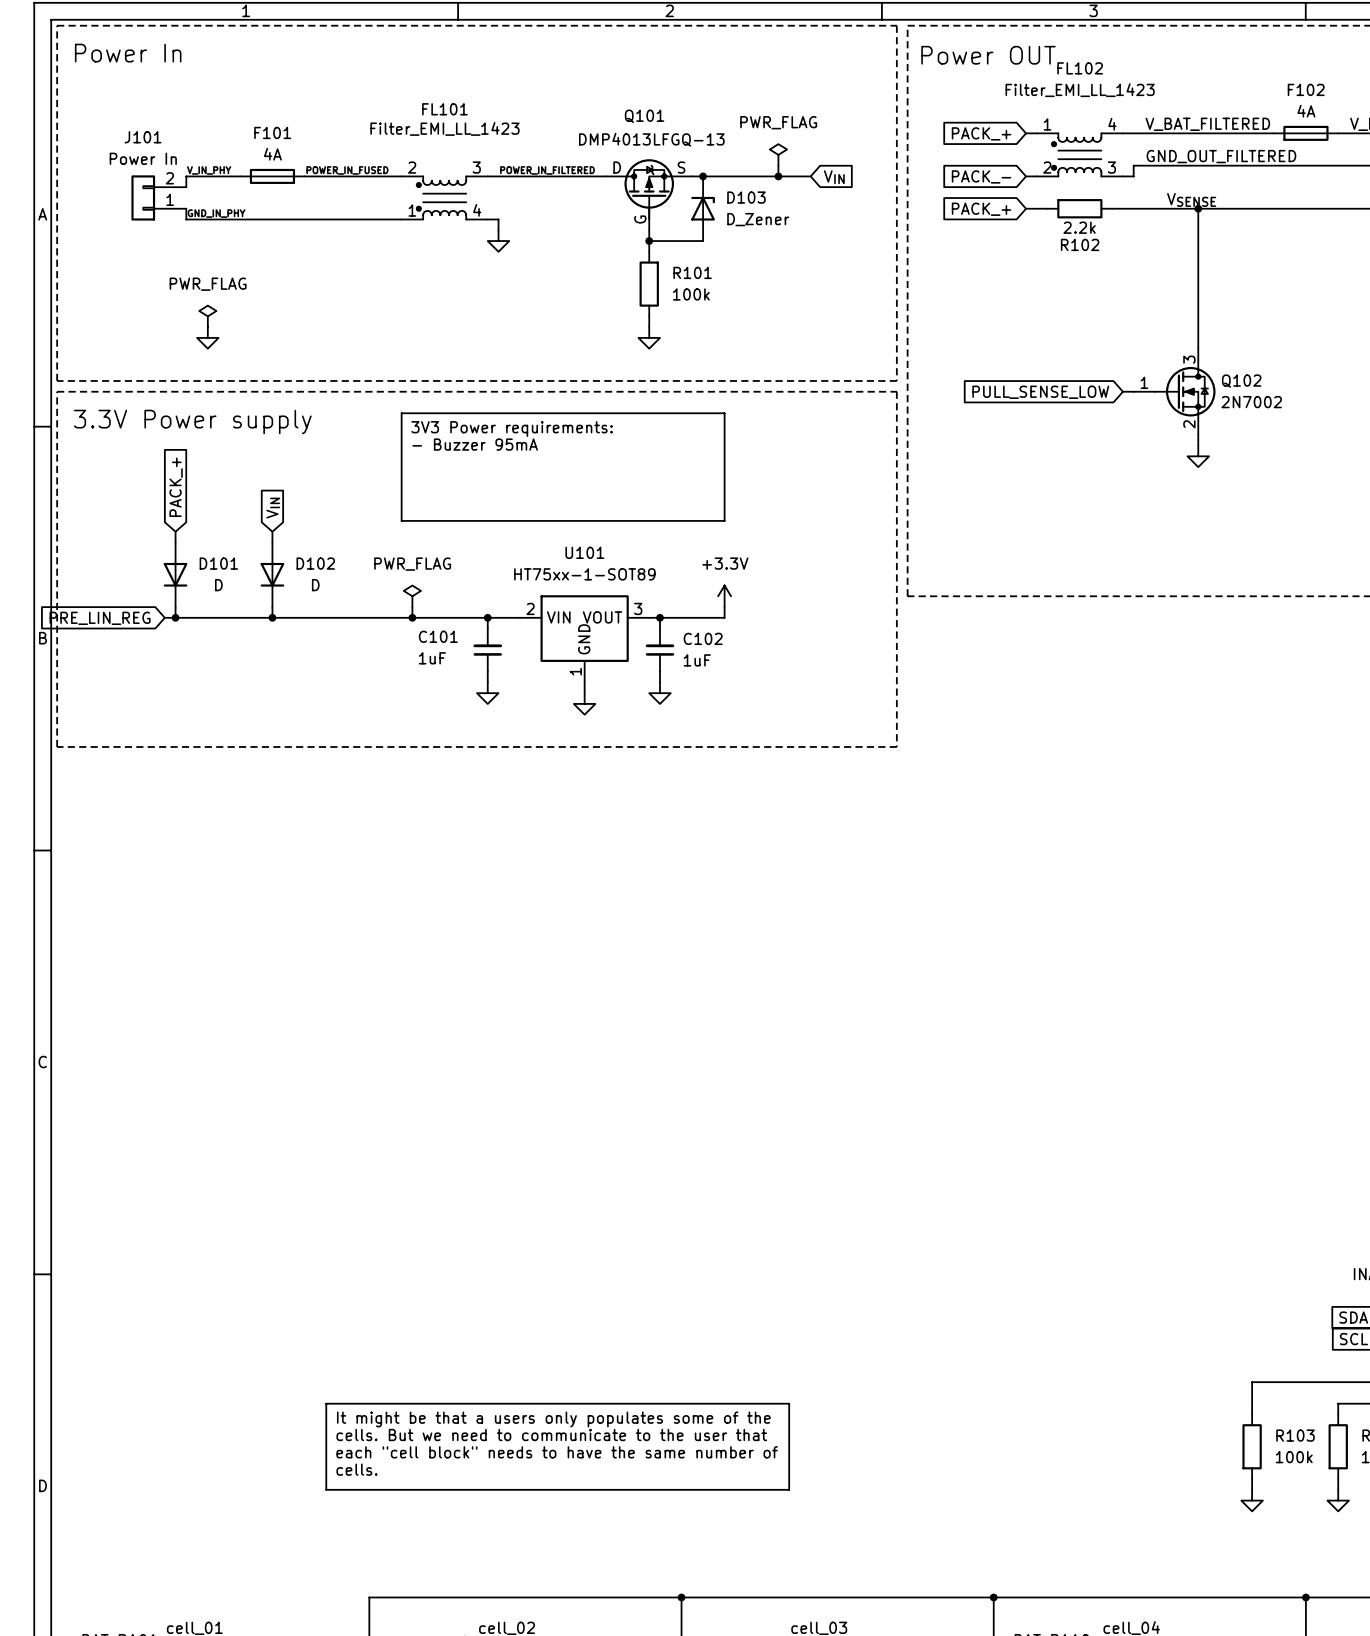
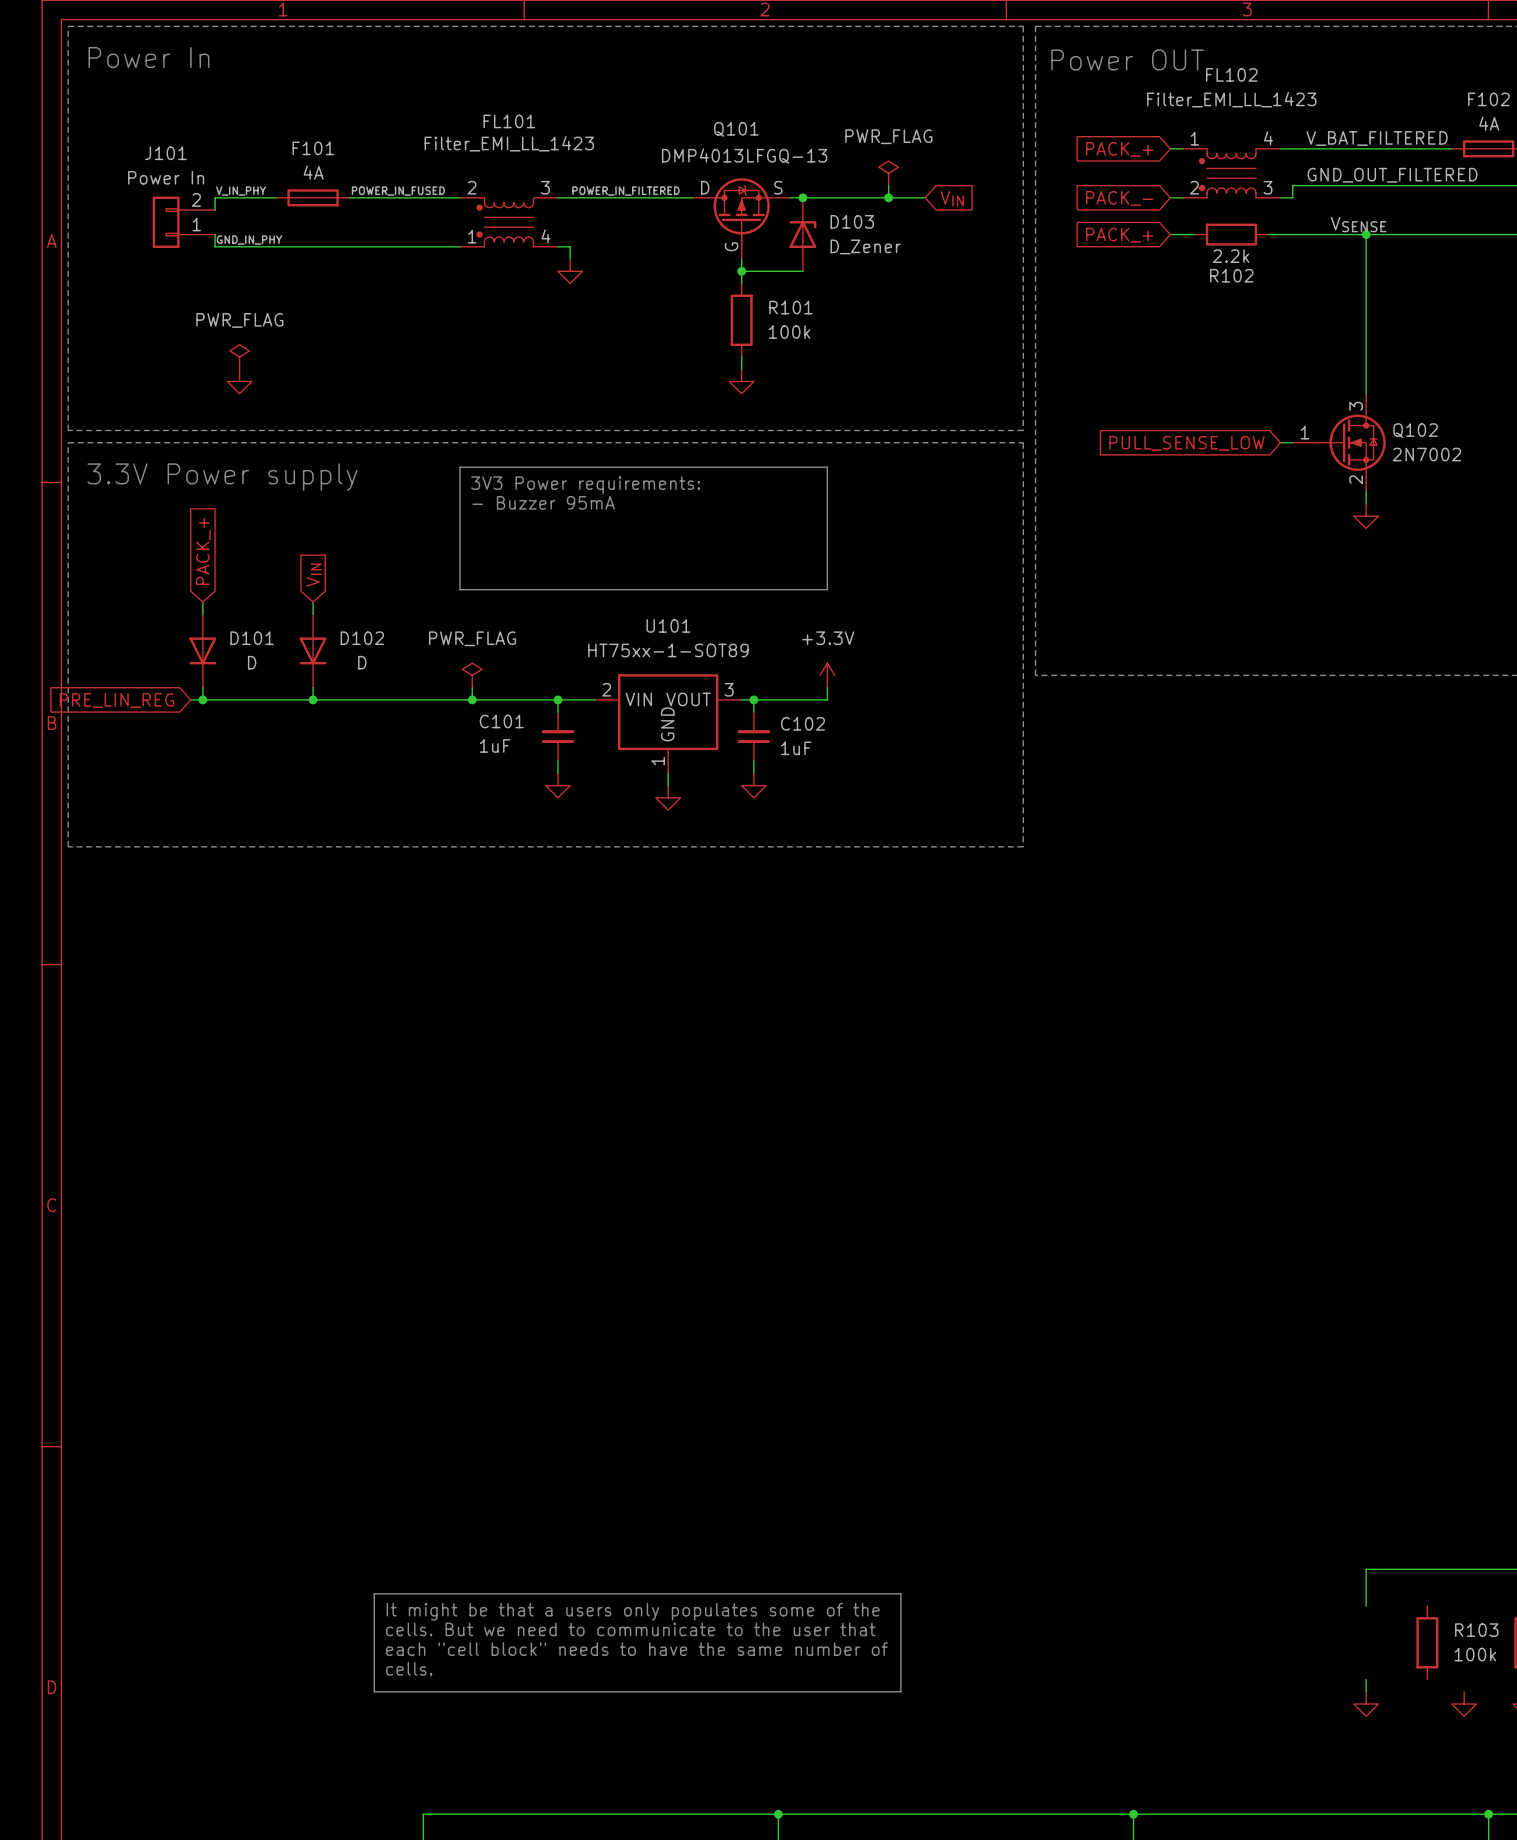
wire: (1252, 1382) (1252, 1414) -> (1427, 1569) (1366, 1569) (1366, 1606)
wire: (1252, 1479) (1252, 1489) -> (1366, 1679) (1366, 1691)
power symbol: none -> (1366, 1704)
power symbol: (1252, 1500) -> none
power symbol: none -> (1464, 1704)

